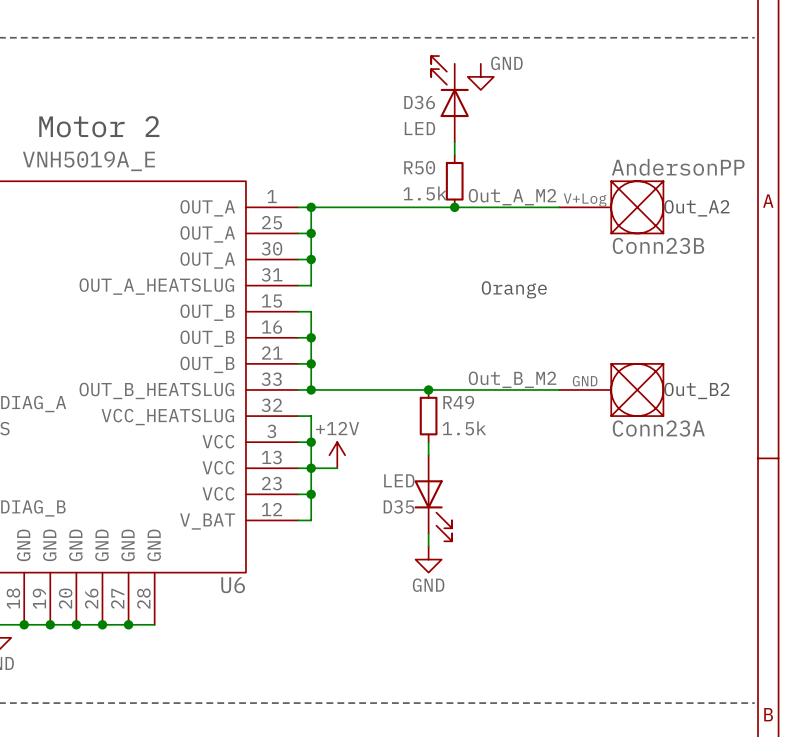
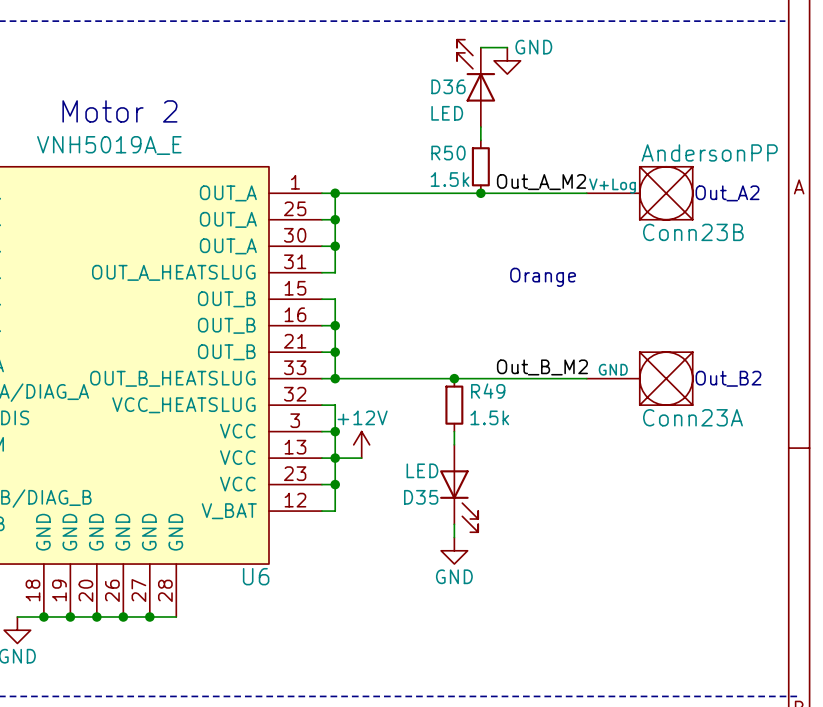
wire: none -> (480, 47) (507, 47)
line: none -> (785, 696) (798, 696)

